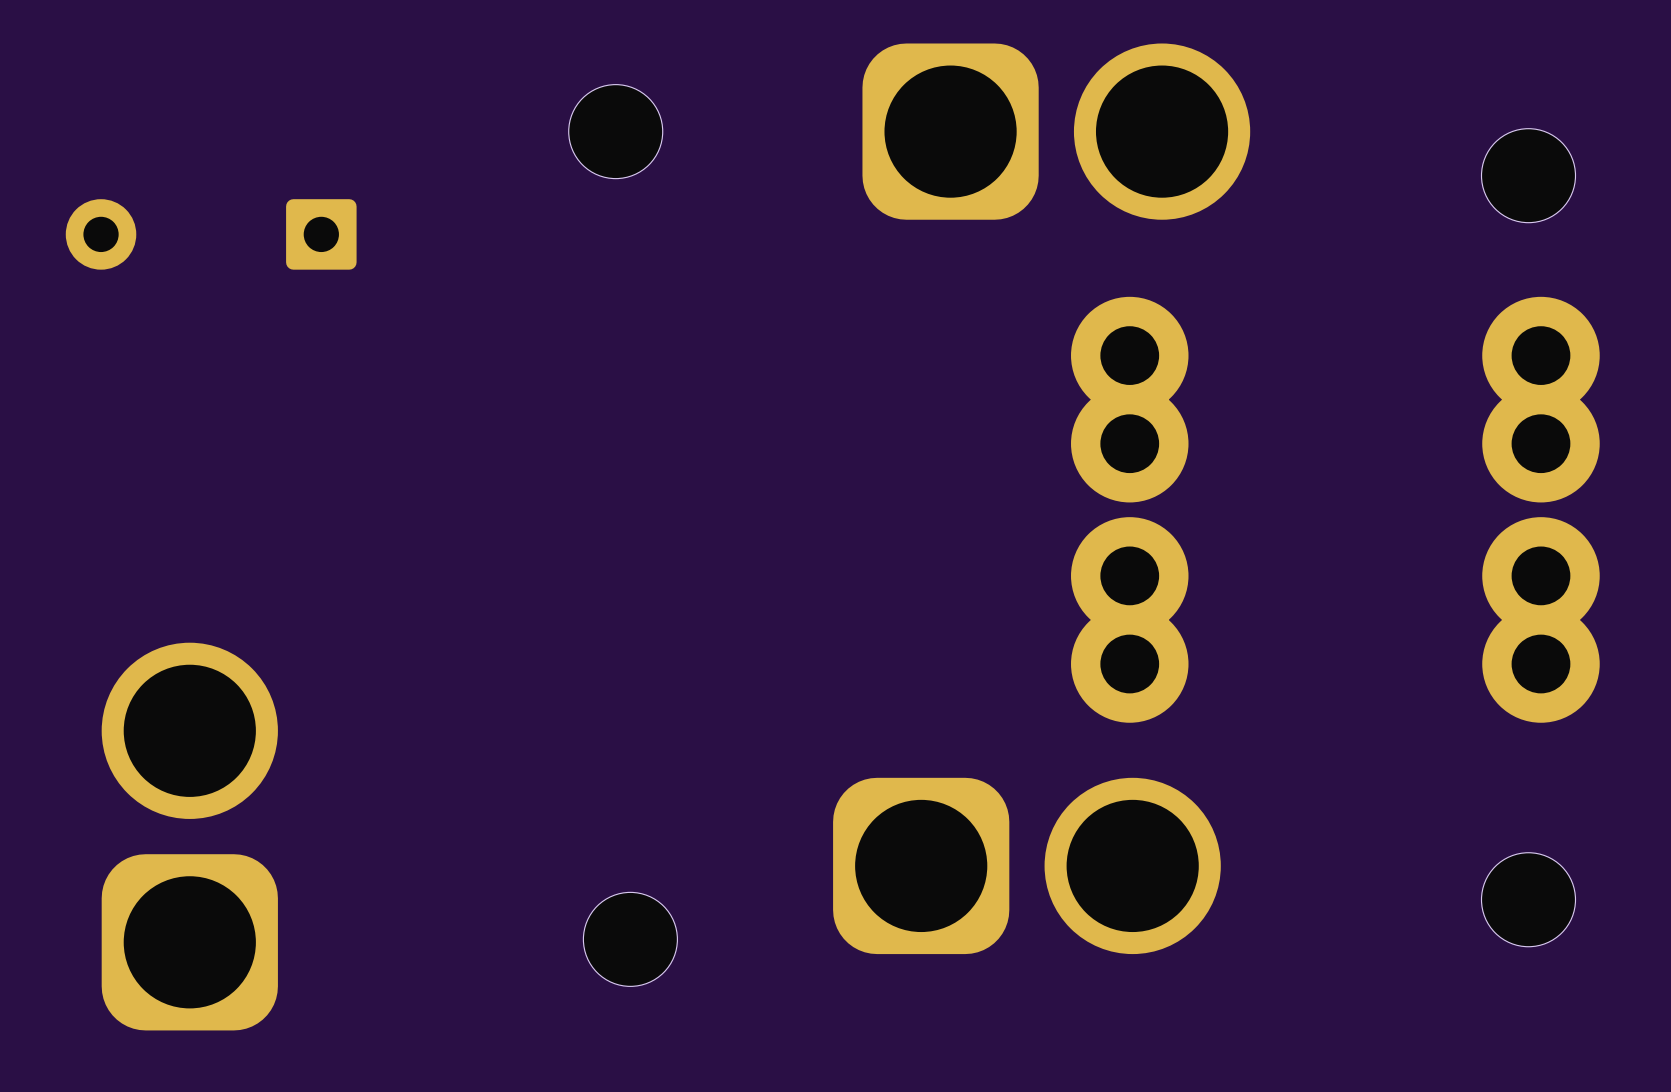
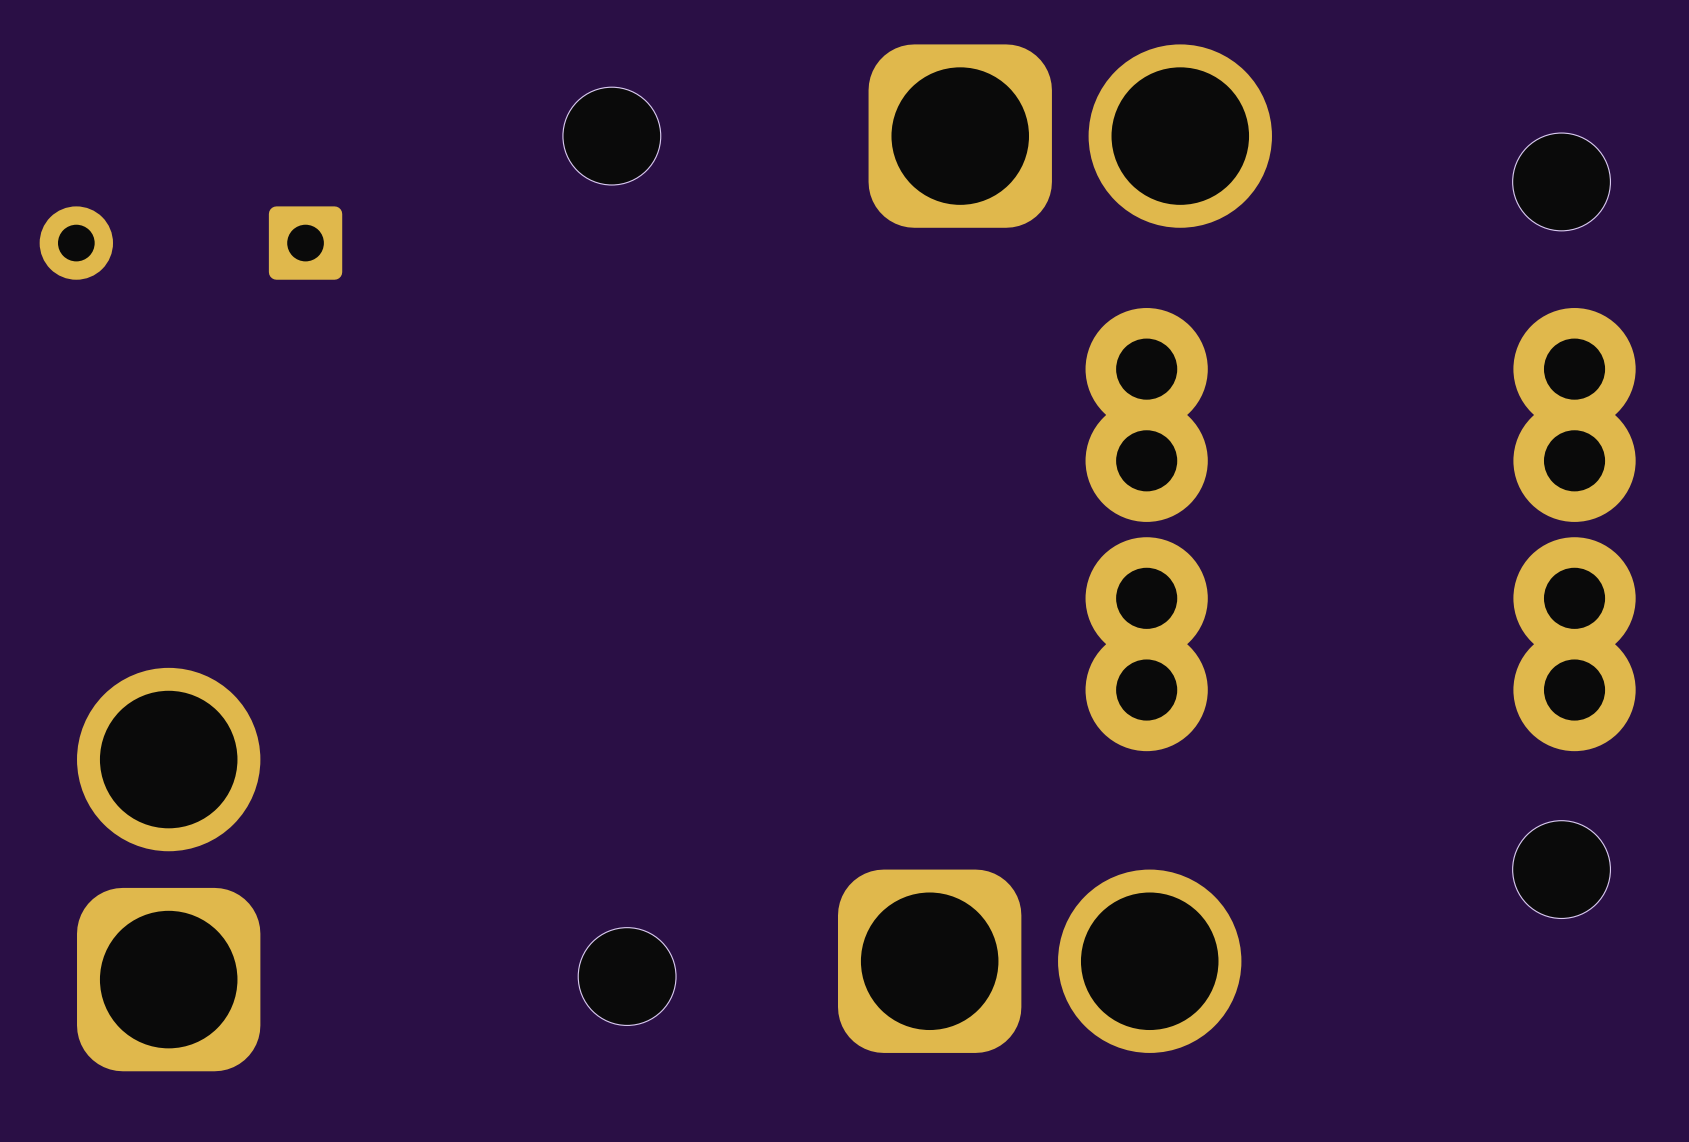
part position: (1026, 865) -> (1039, 961)
part position: (1528, 899) -> (1561, 869)

